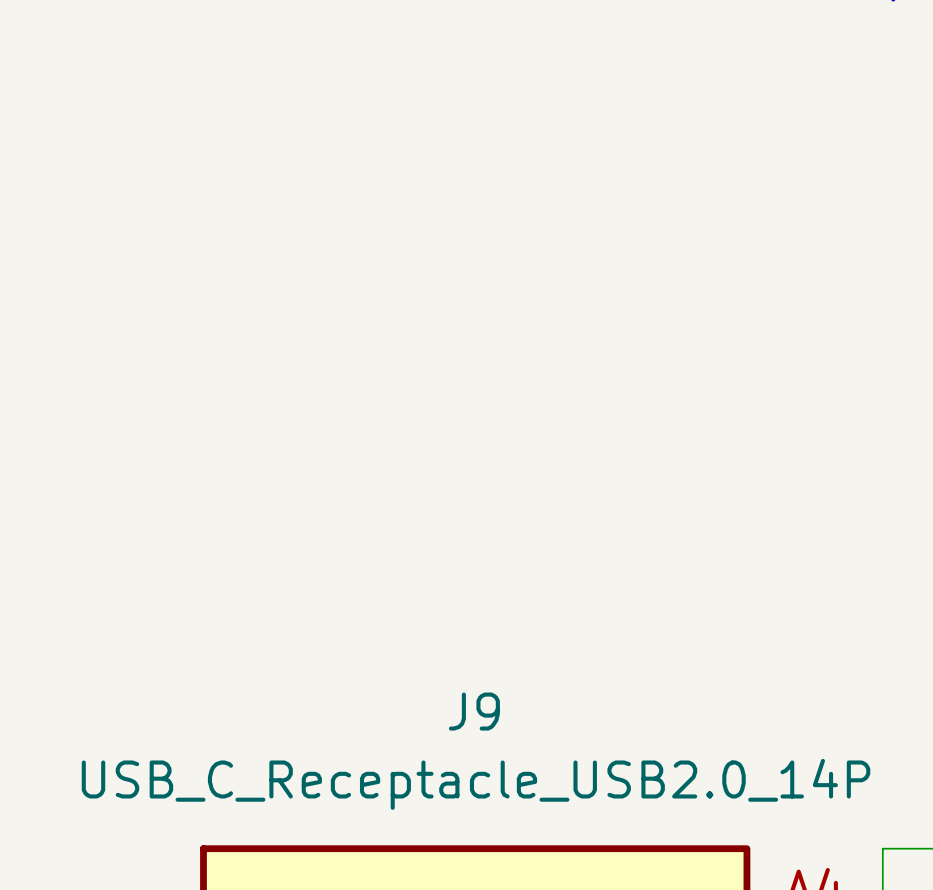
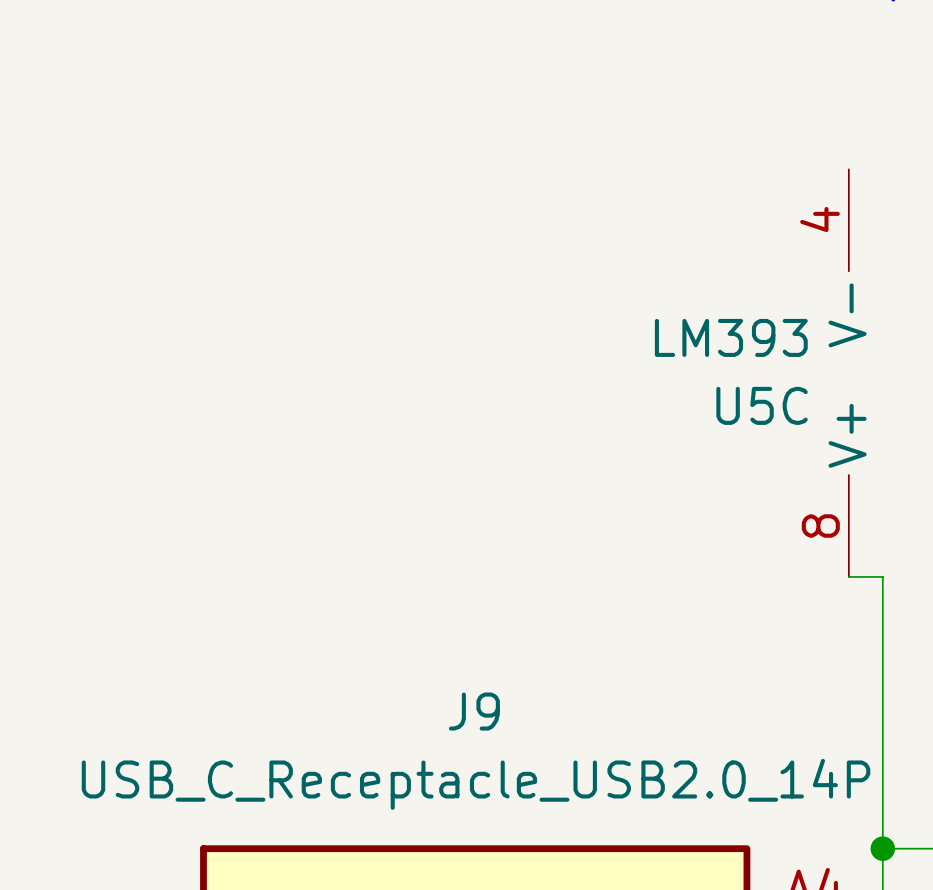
U5C: none -> LM393 (848, 373)
wire: none -> (848, 576) (882, 576) (882, 848)
junction: none -> (882, 848)

